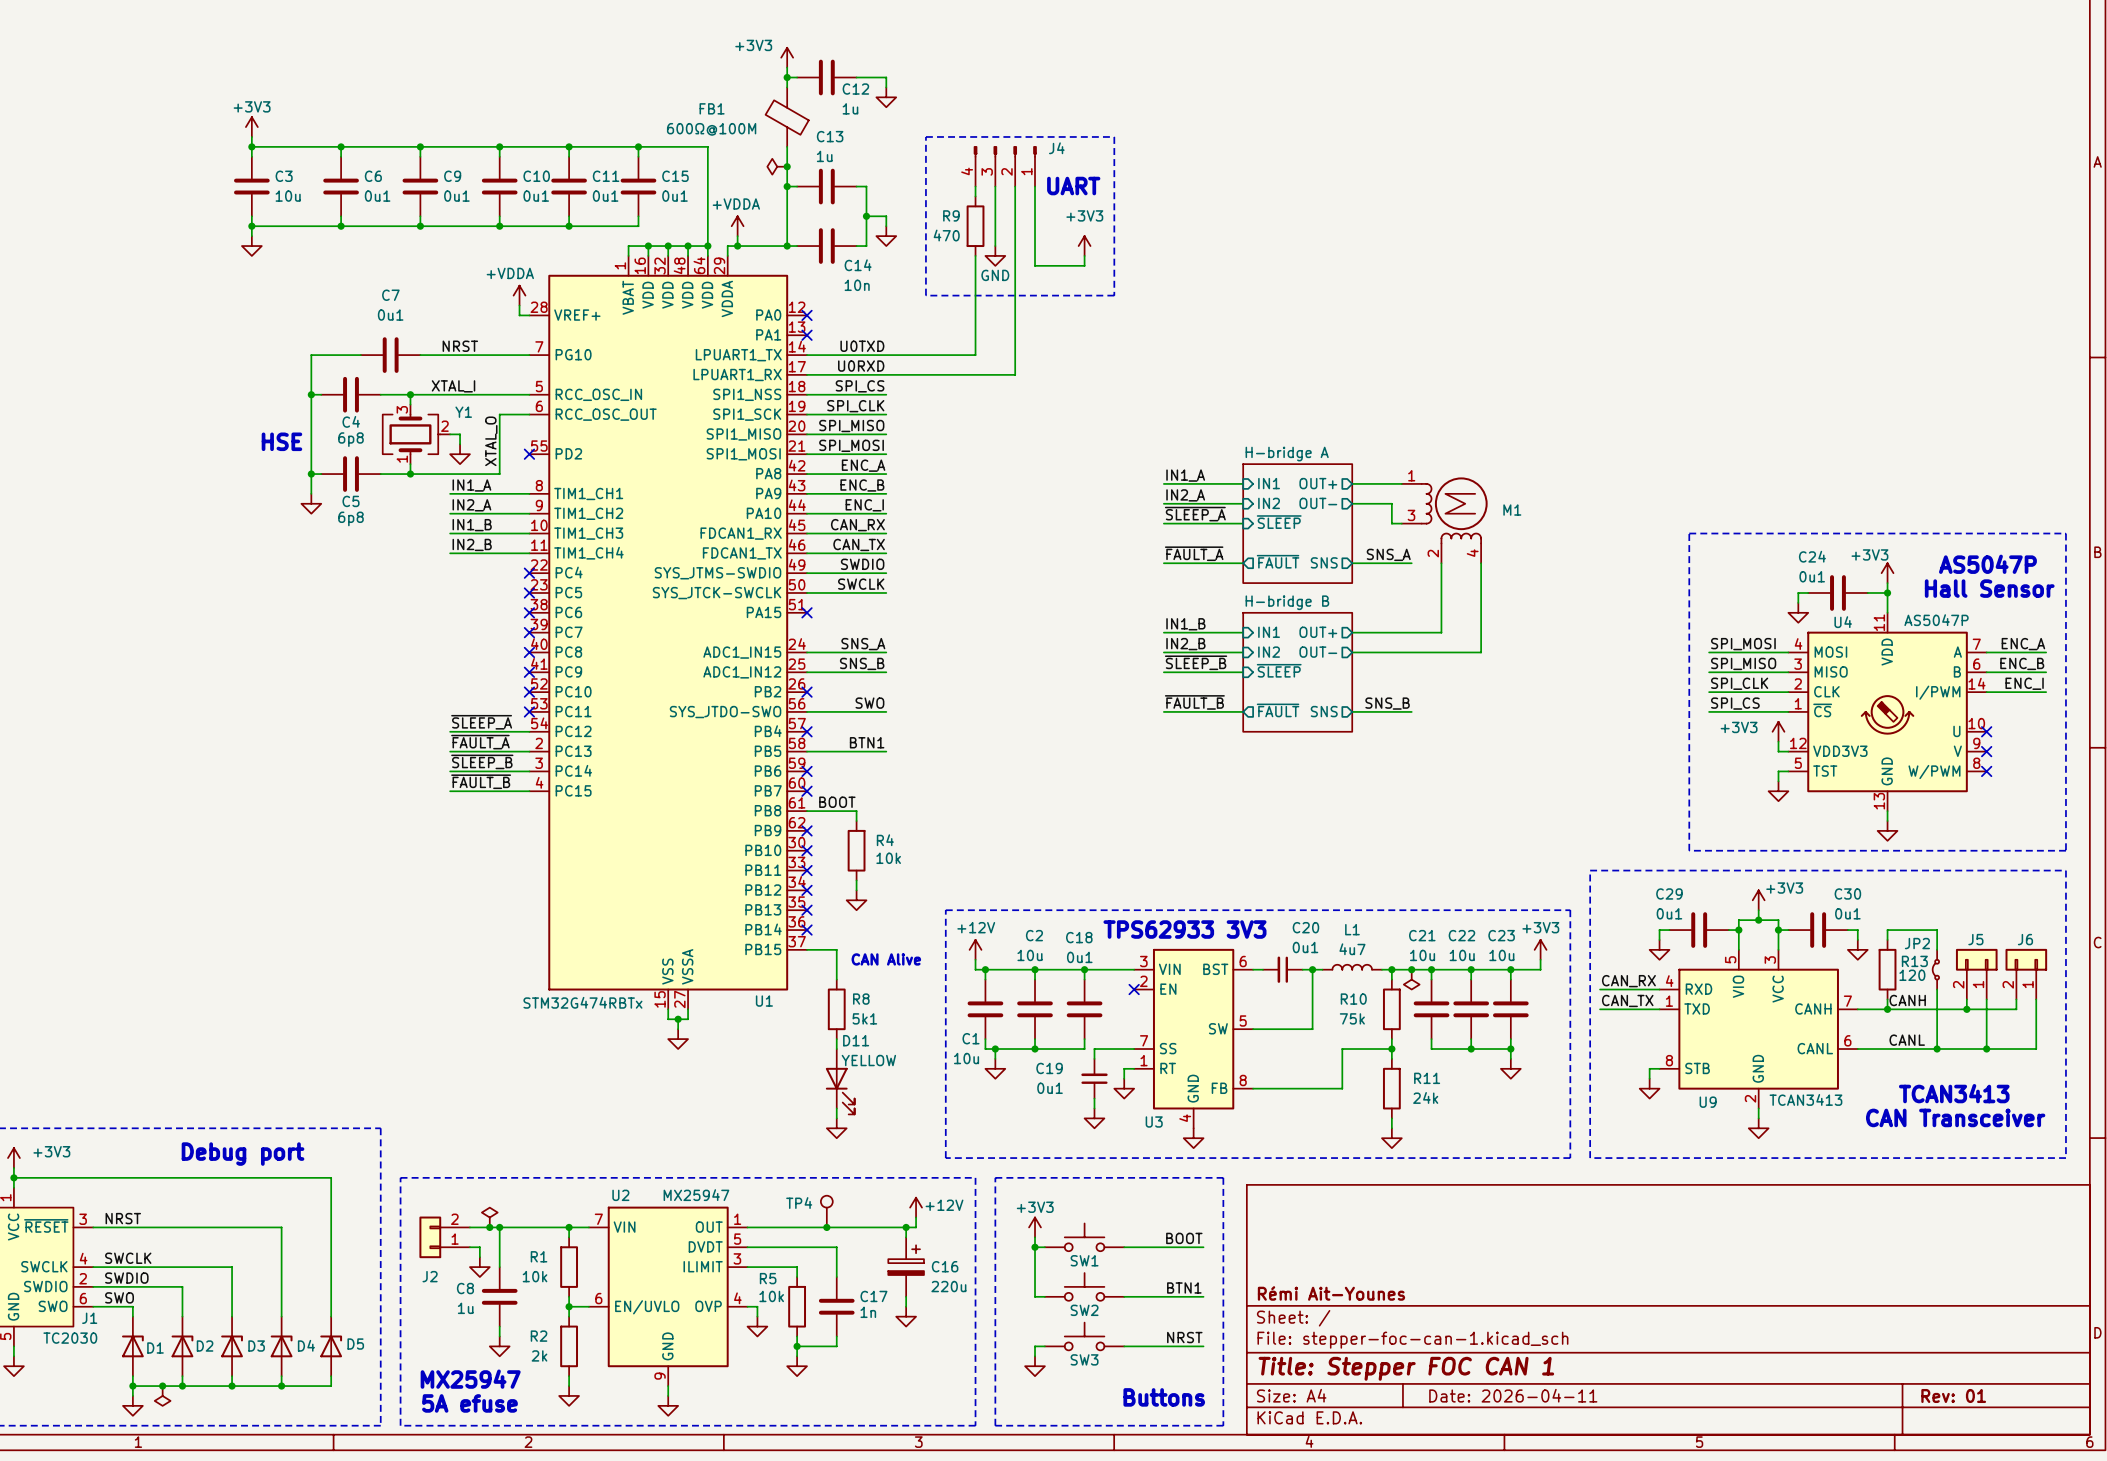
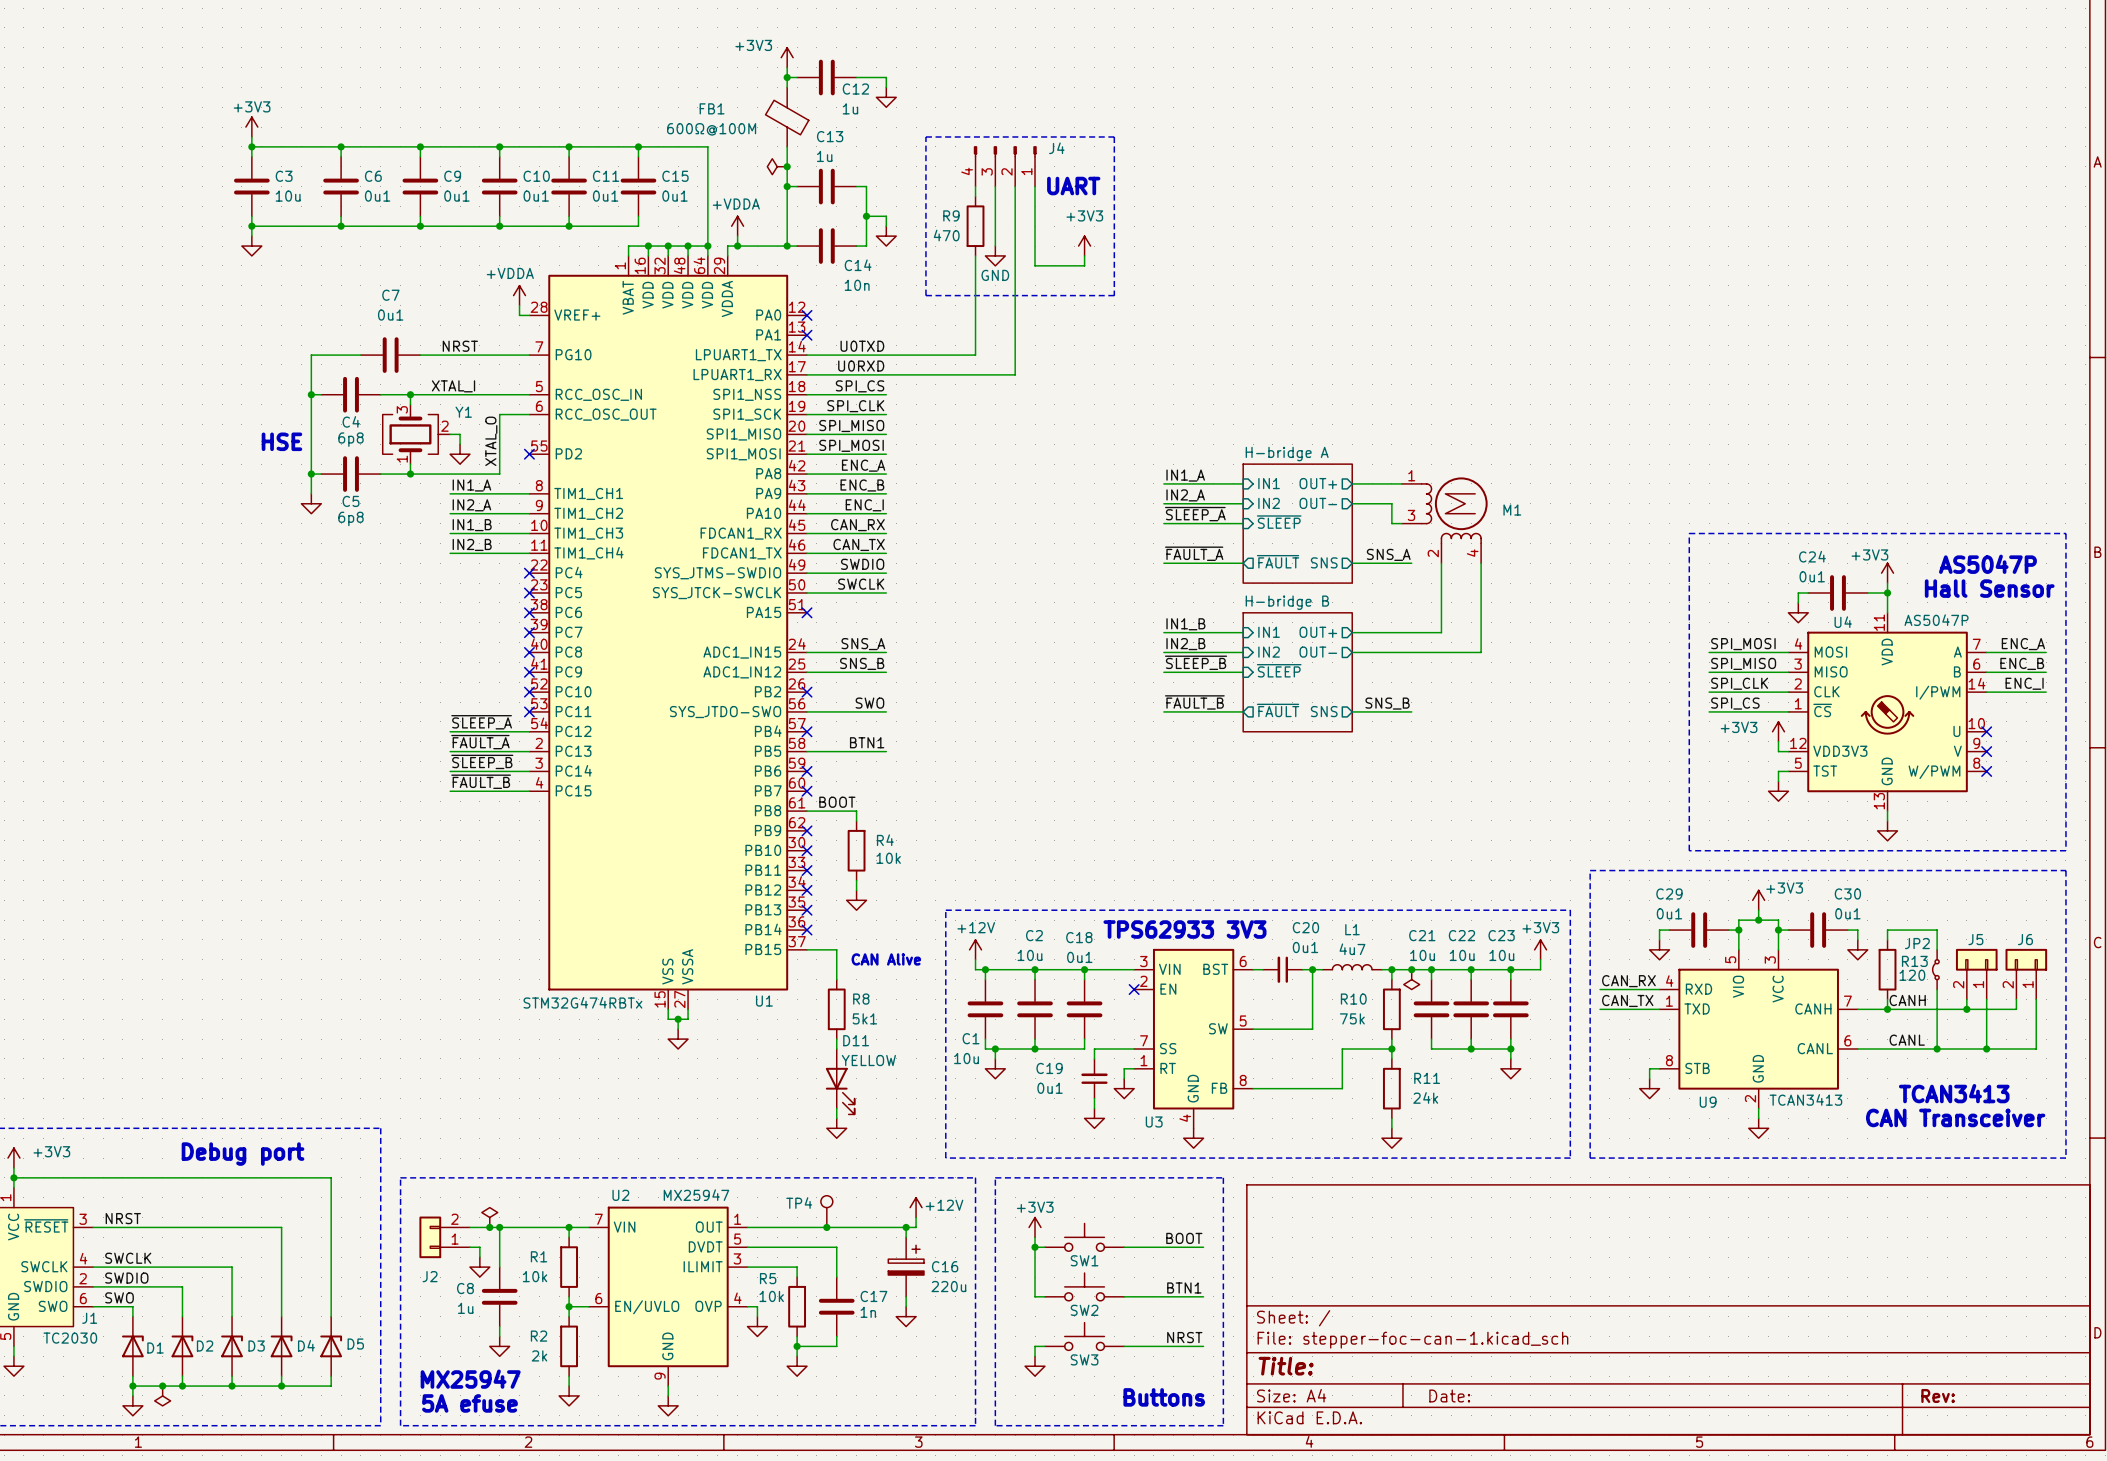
title block: Rémi Ait-Younes (1331, 1293) -> none
title block: Title: Stepper FOC CAN 1 (1406, 1368) -> Title: (1286, 1366)
title block: Date: 2026-04-11 (1513, 1395) -> Date: (1449, 1395)
title block: Rev: 01 (1953, 1395) -> Rev: (1938, 1395)

